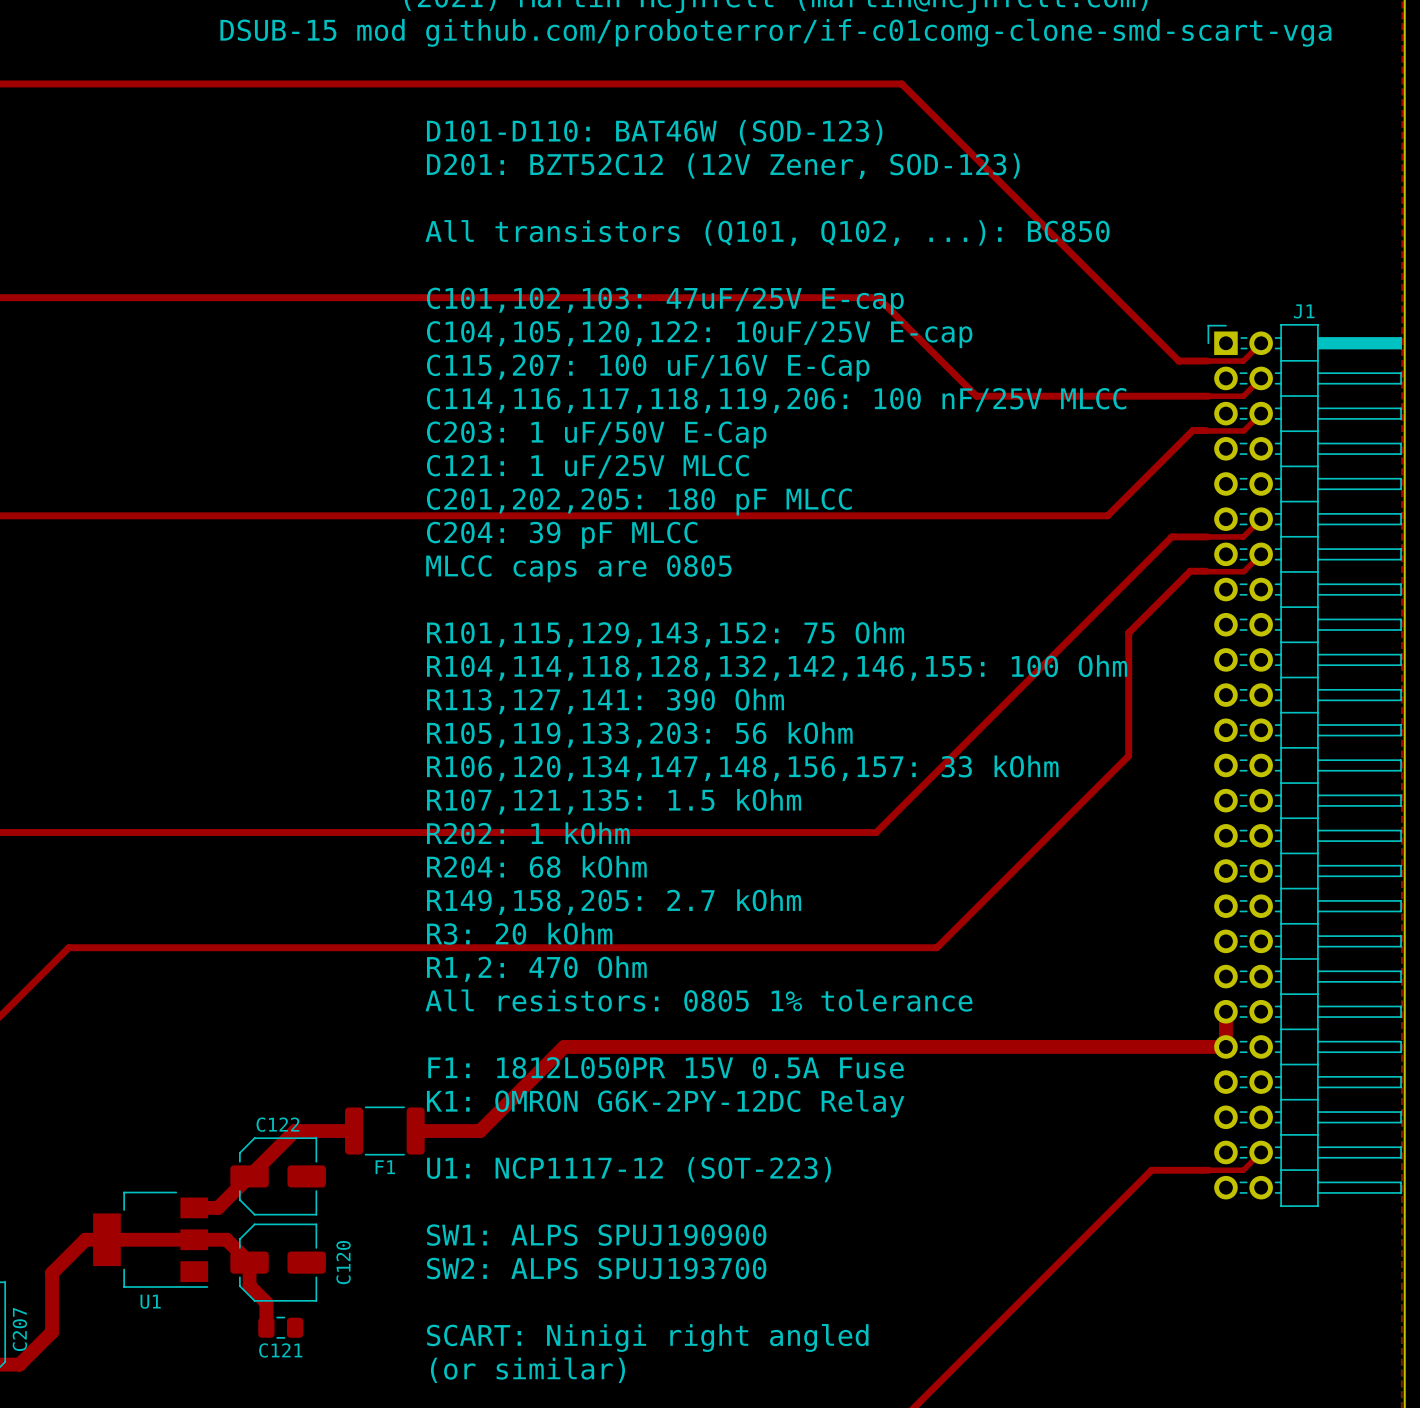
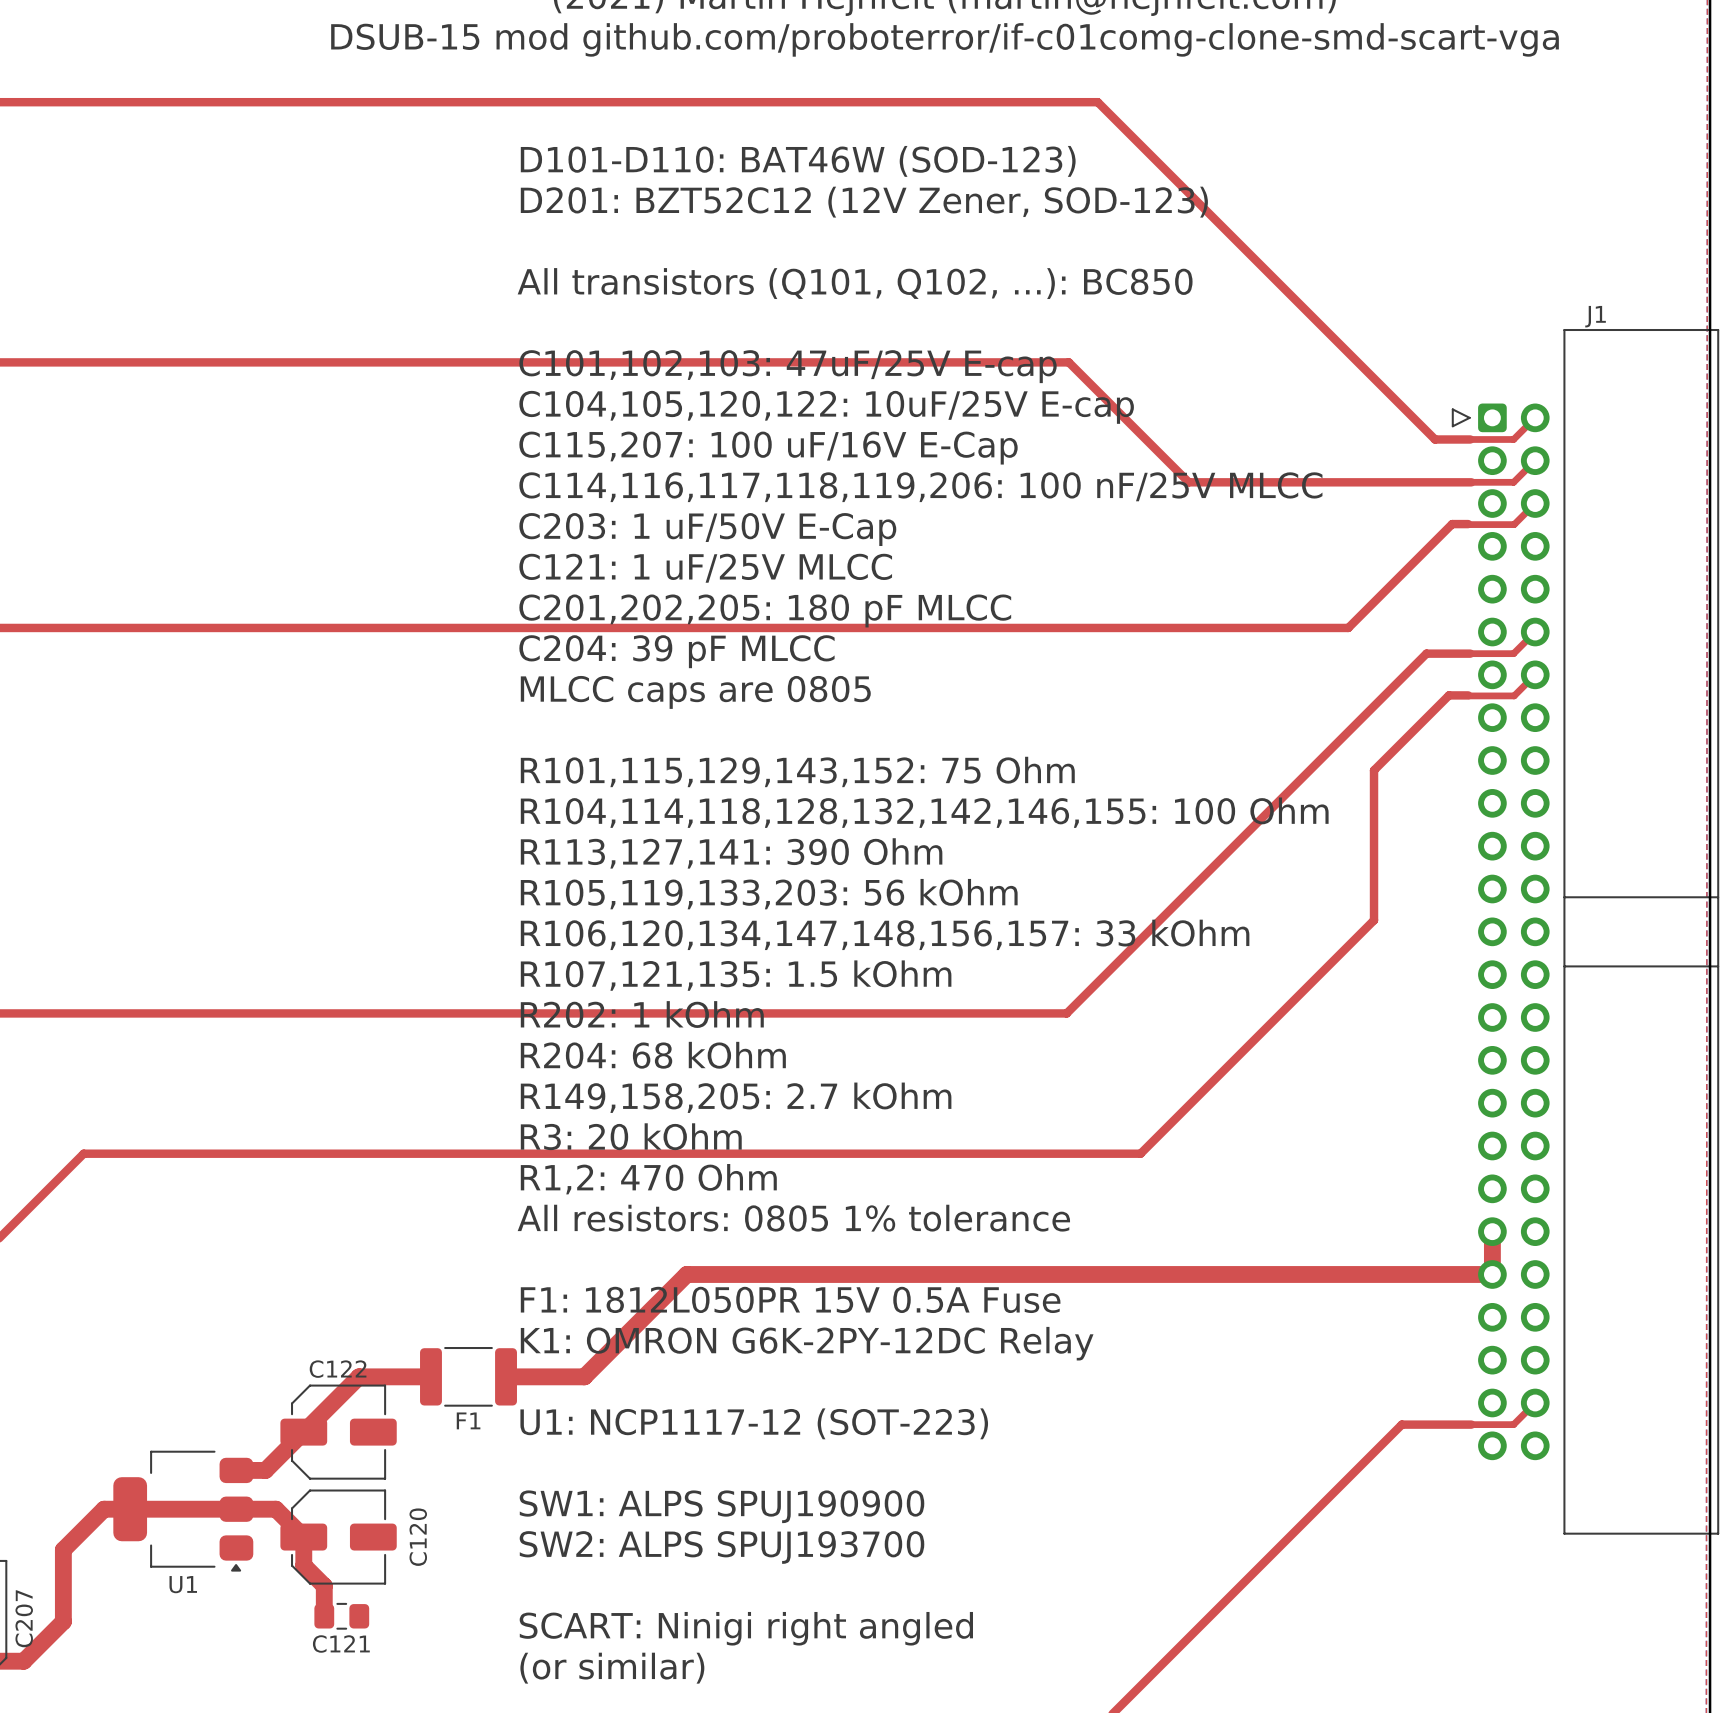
J1 name position: J1 (1304, 311) -> J1 (1595, 316)
J1 footprint: [1207, 323, 1402, 1207] -> [1451, 328, 1720, 1535]
U1 footprint: [93, 1191, 209, 1288] -> [113, 1450, 254, 1572]

